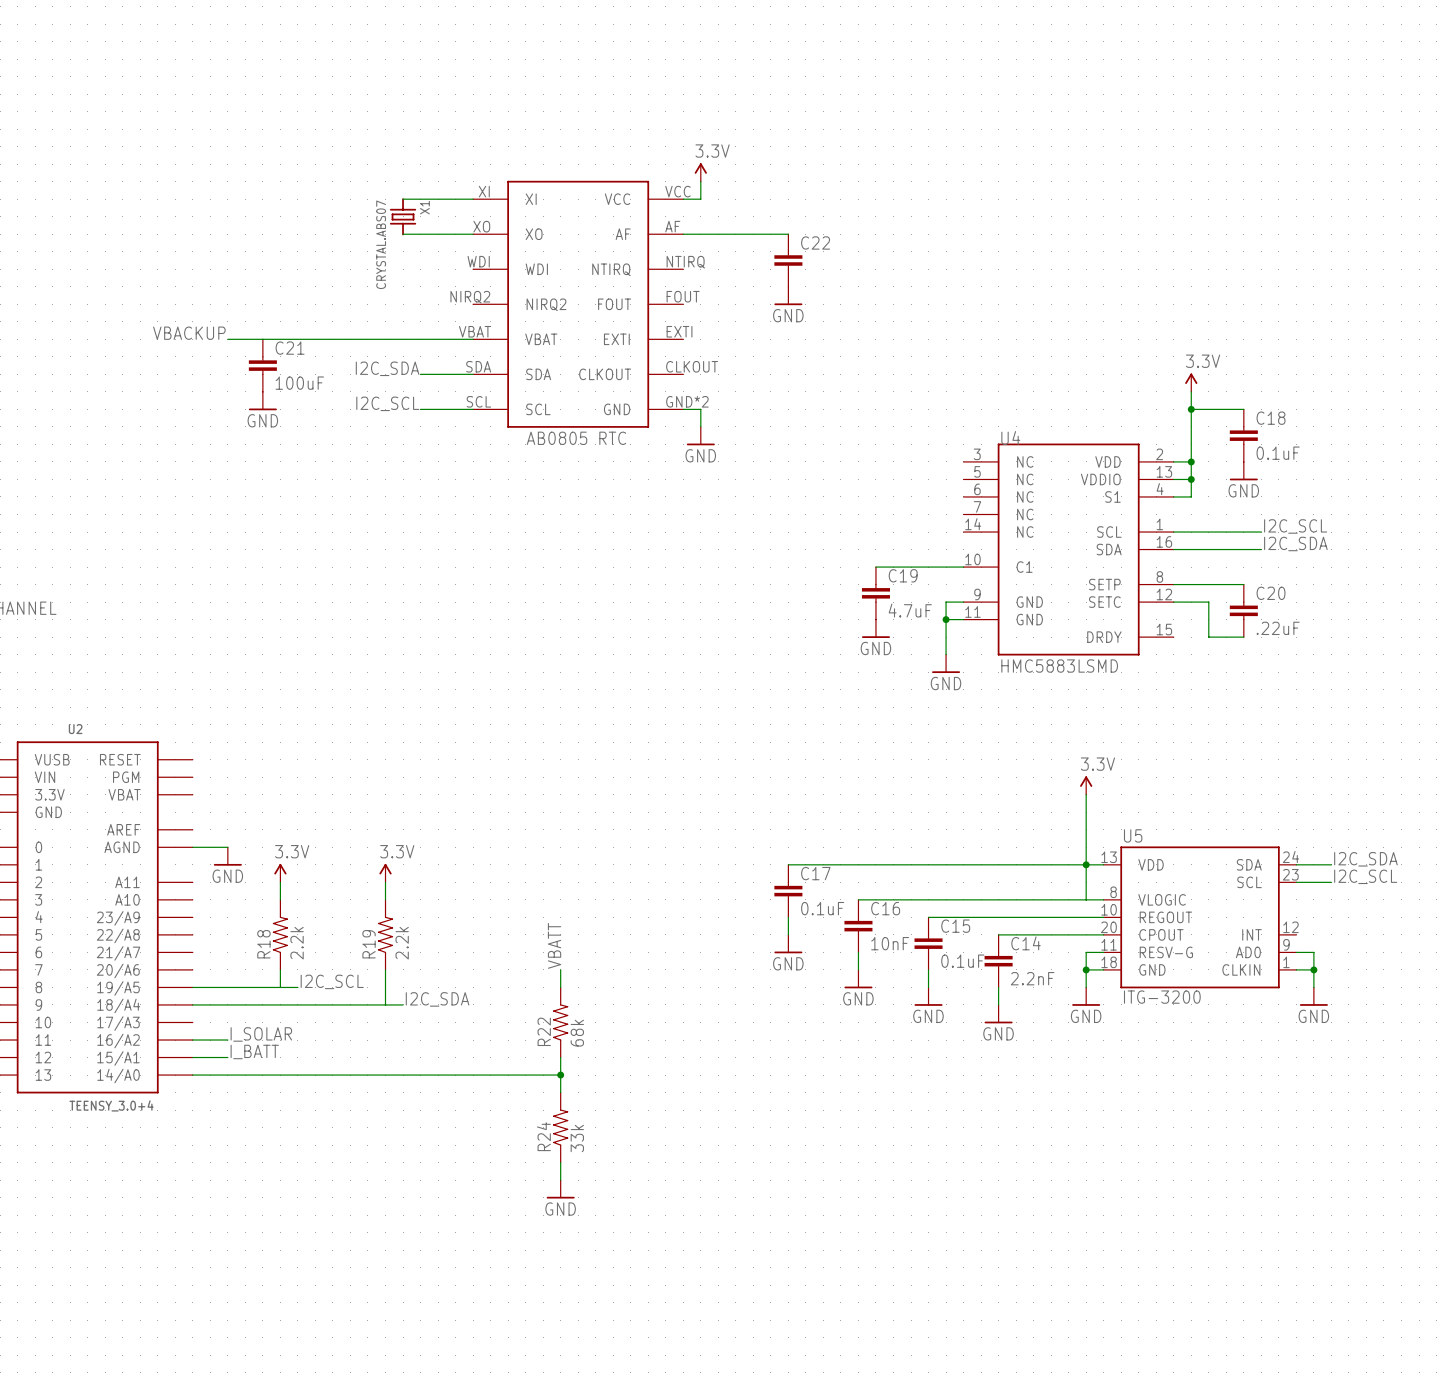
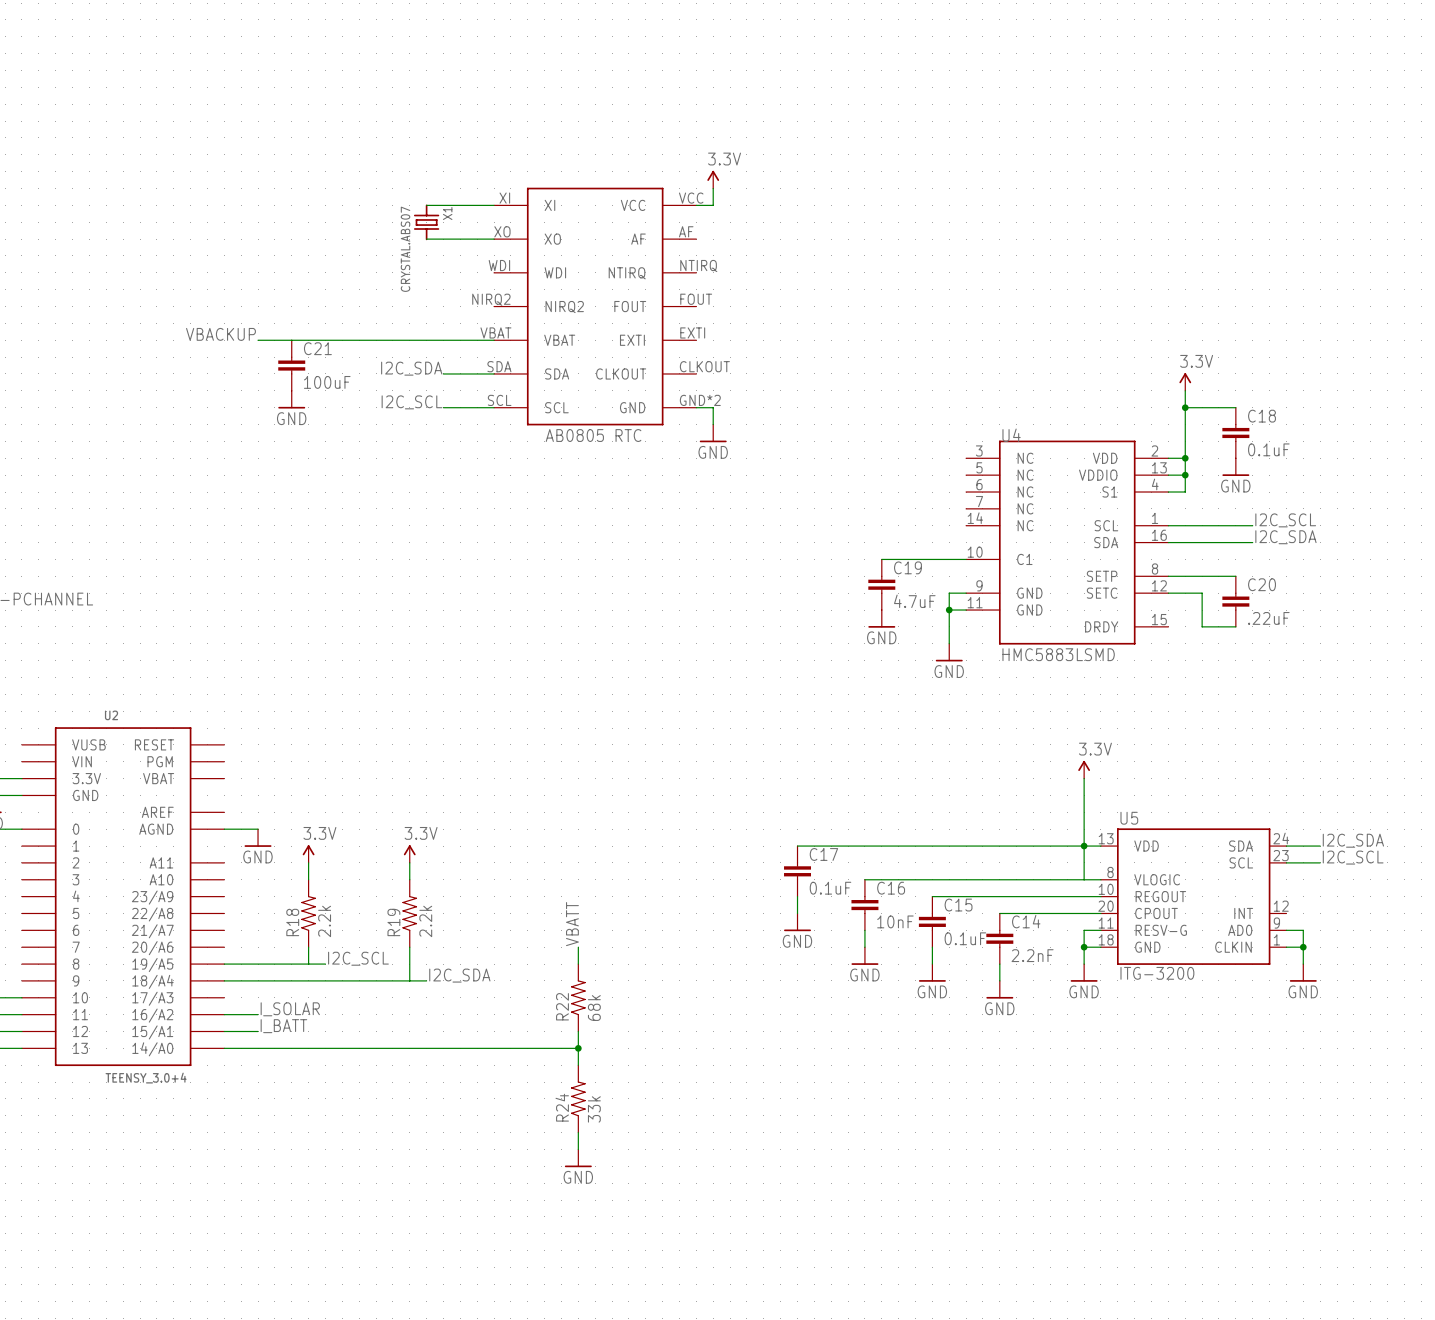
wire: (683, 234) (788, 234) -> none
C22: (788, 260) -> none
power symbol: GND (788, 295) -> none

